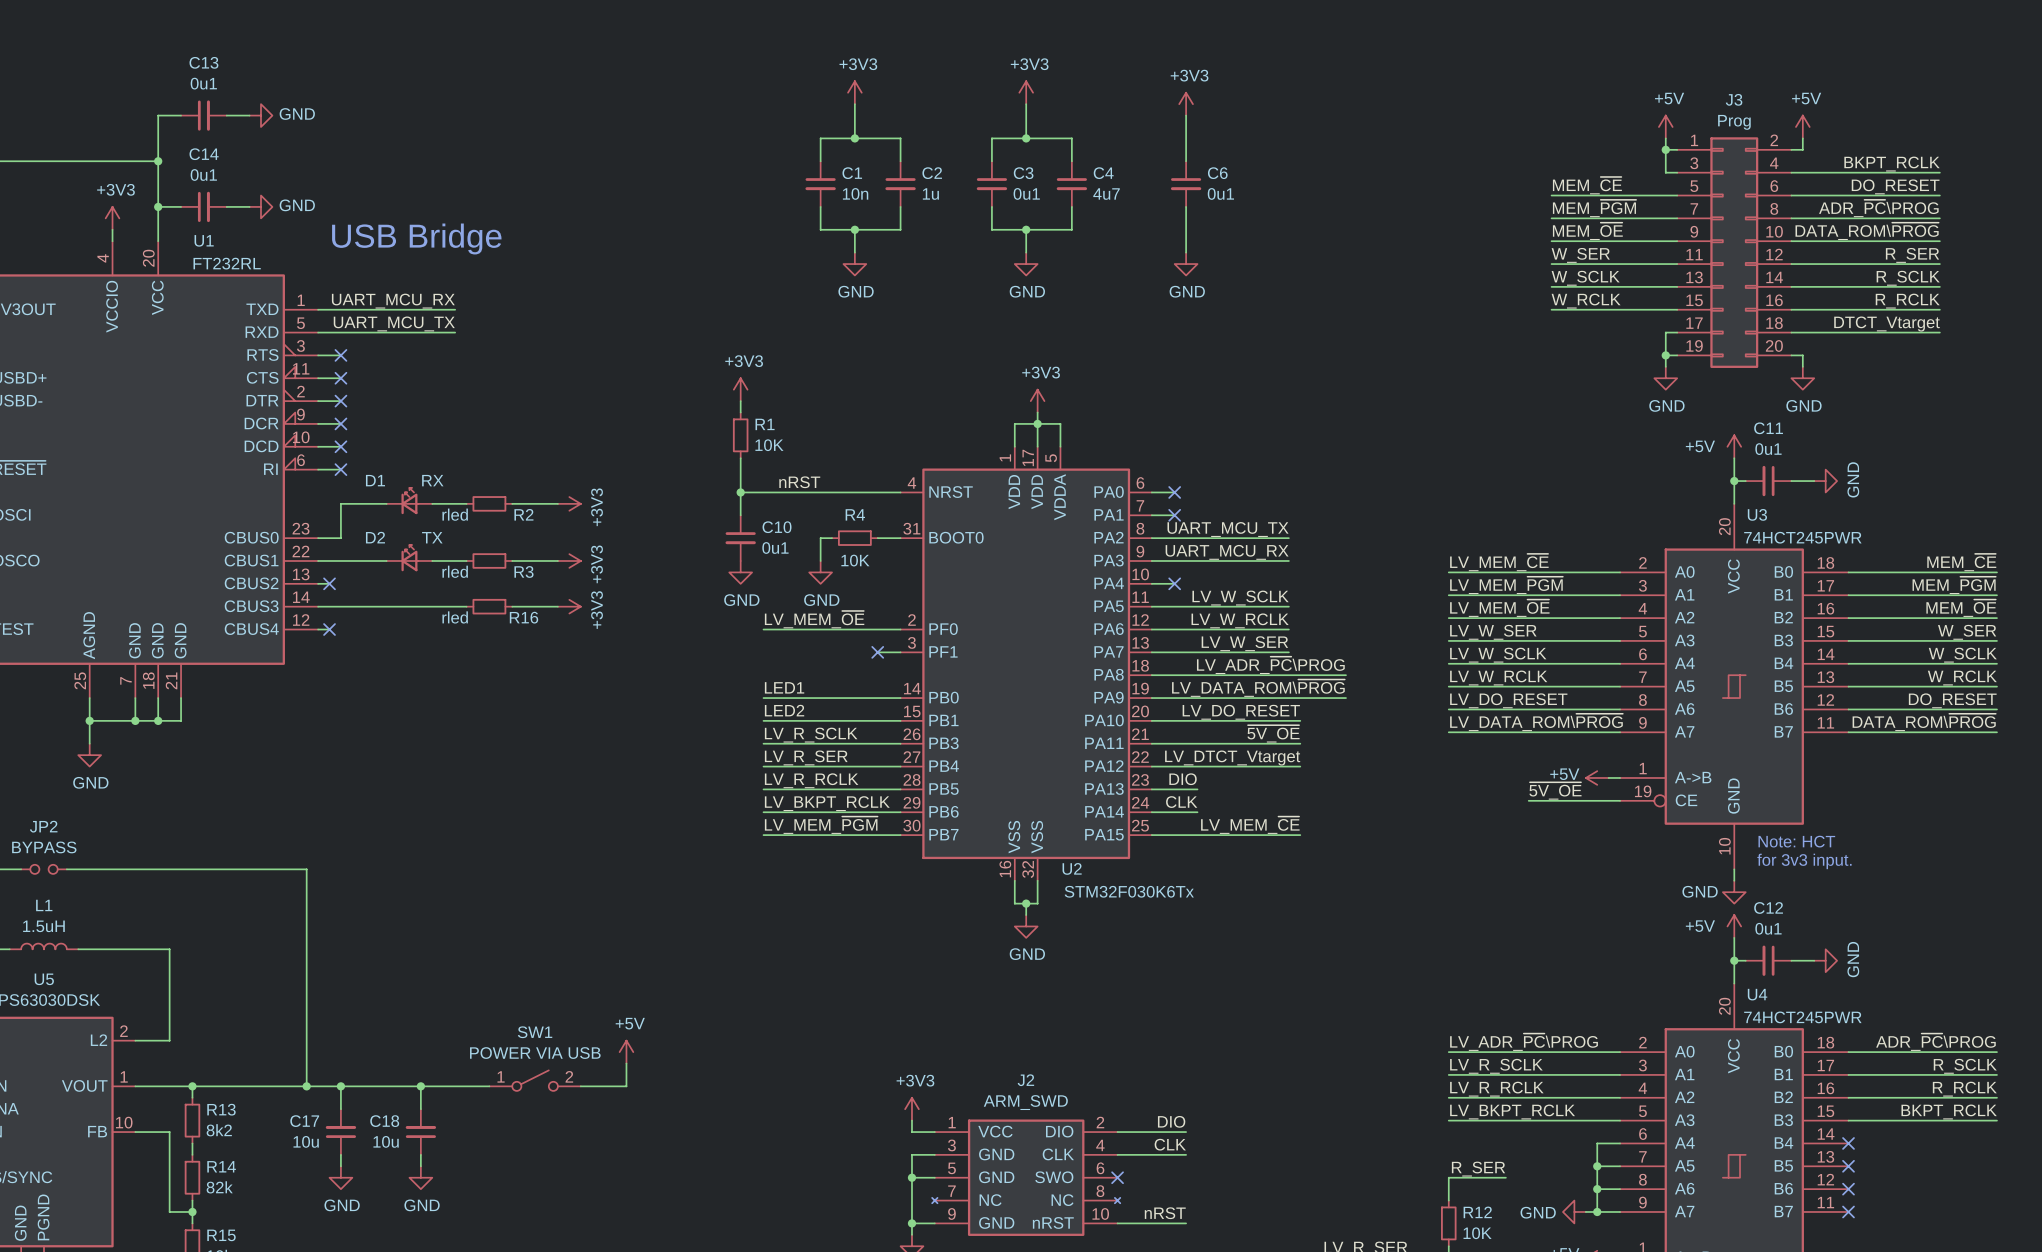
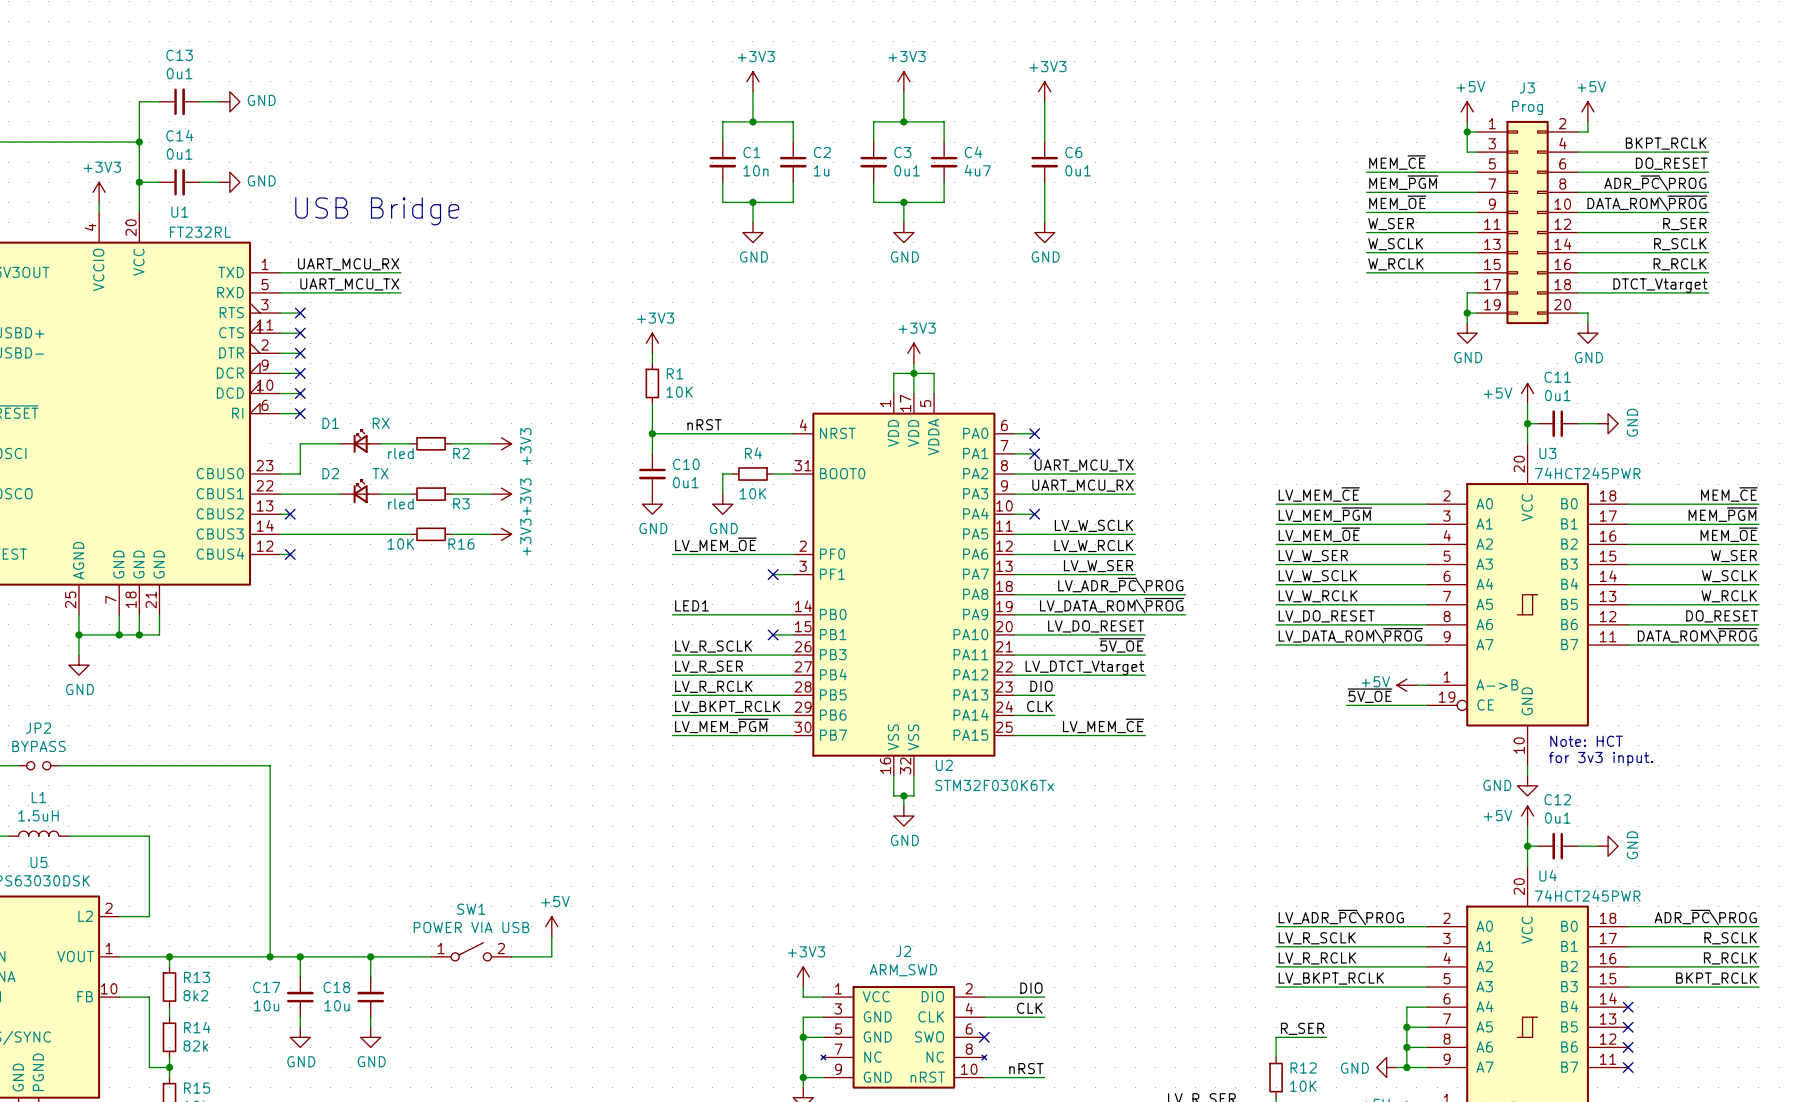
R16 value: rled (455, 617) -> 10K (400, 544)
label: LED2 (784, 710) -> none
wire: (763, 720) (877, 720) -> none
no-connect mark: none -> (773, 634)

